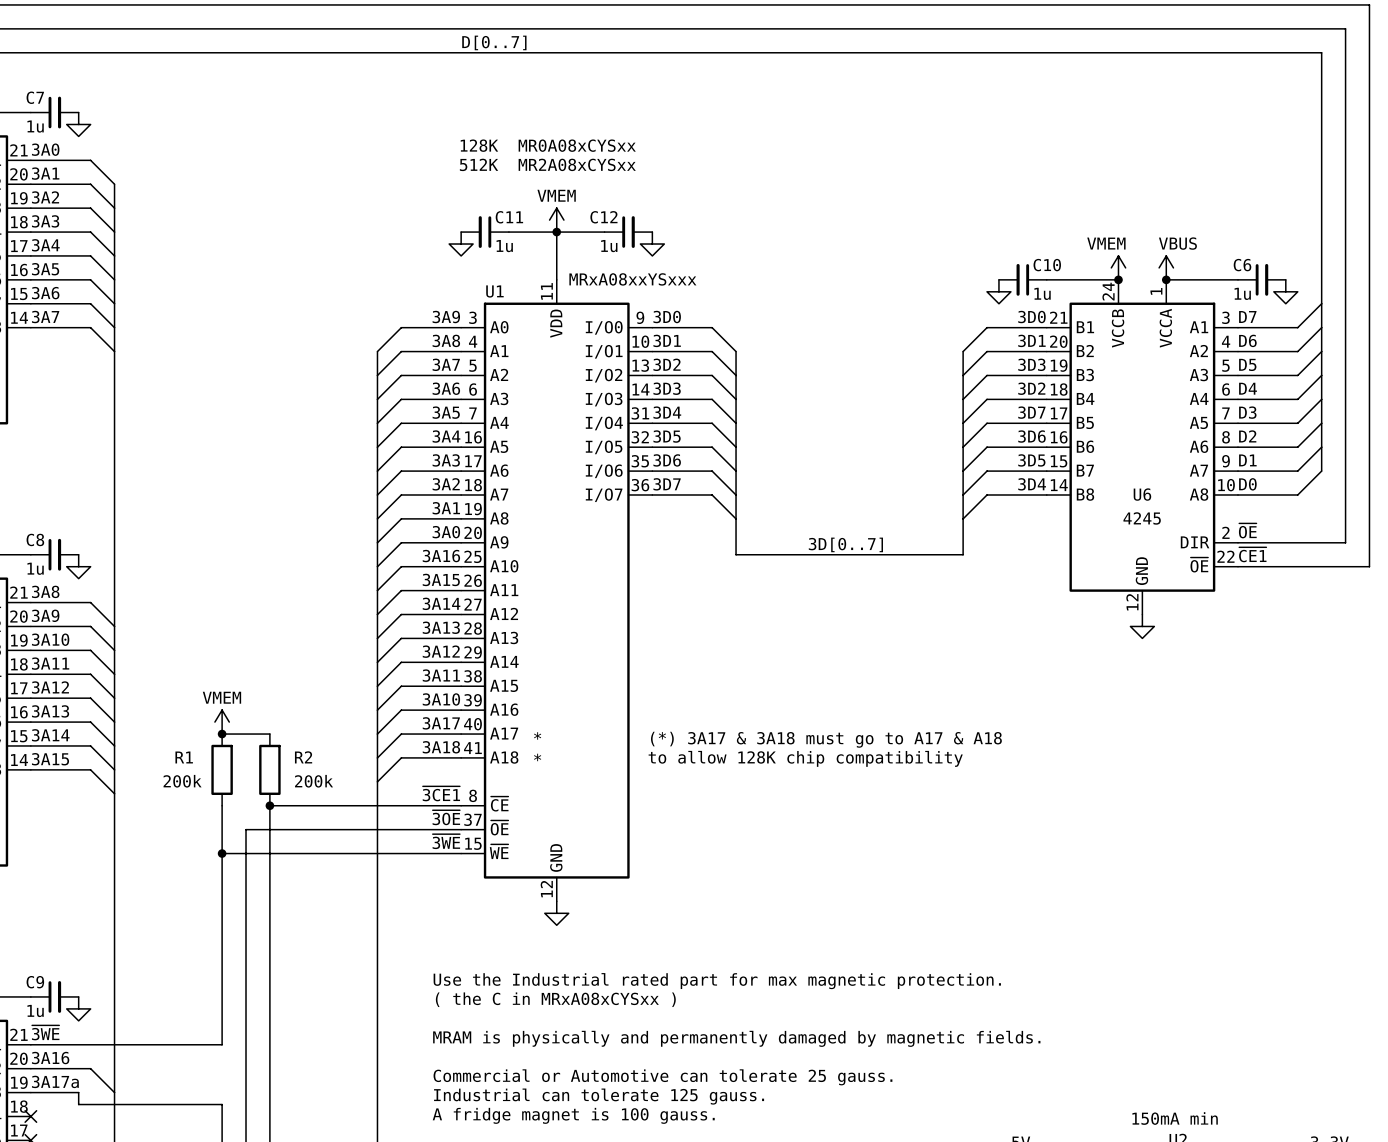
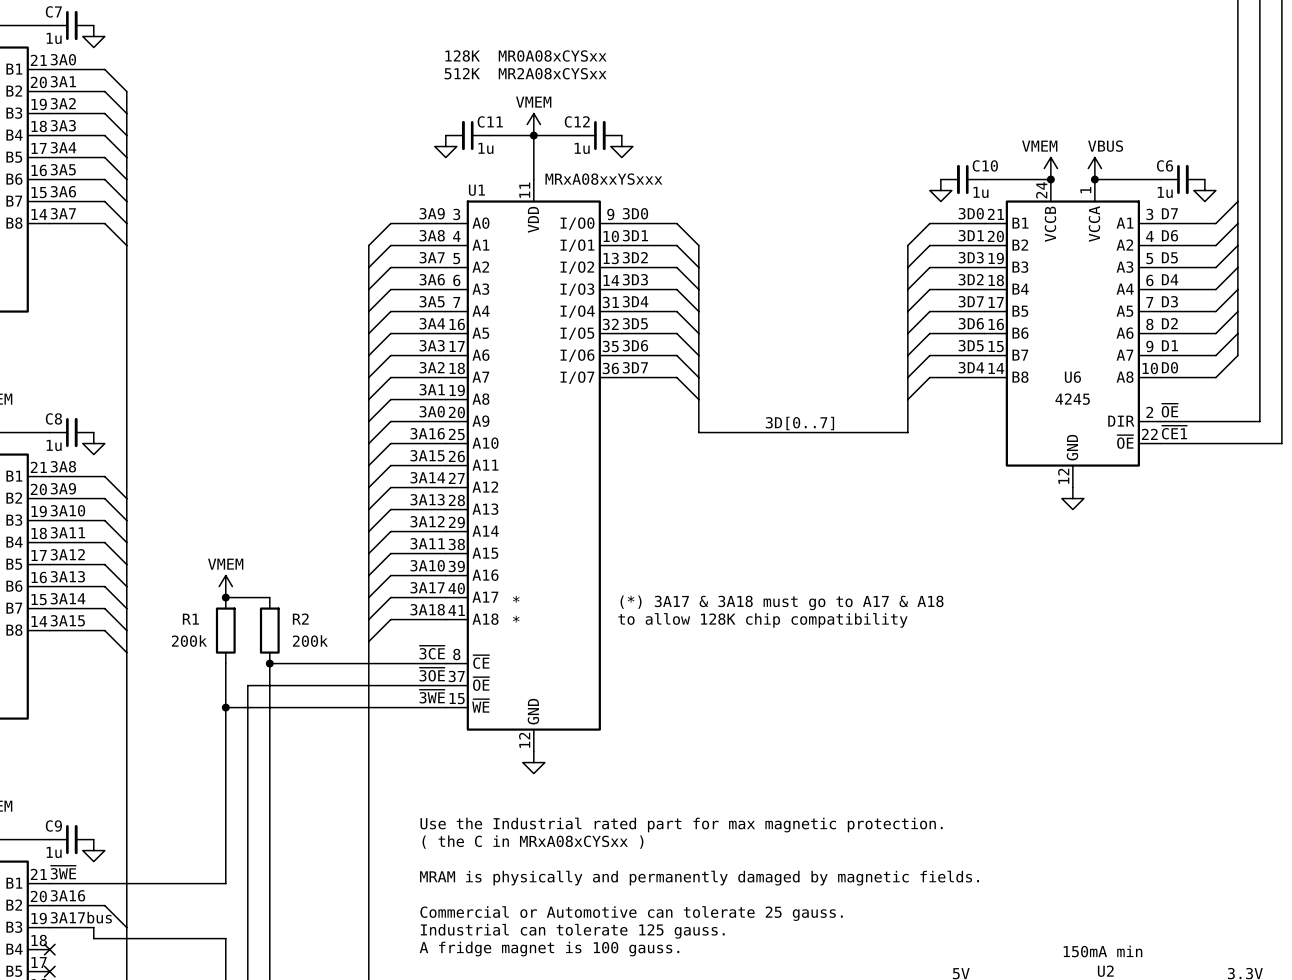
label: ~{3CE1} (441, 793) -> ~{3CE} (432, 652)
label: 3A17a (55, 1081) -> 3A17bus (81, 917)

